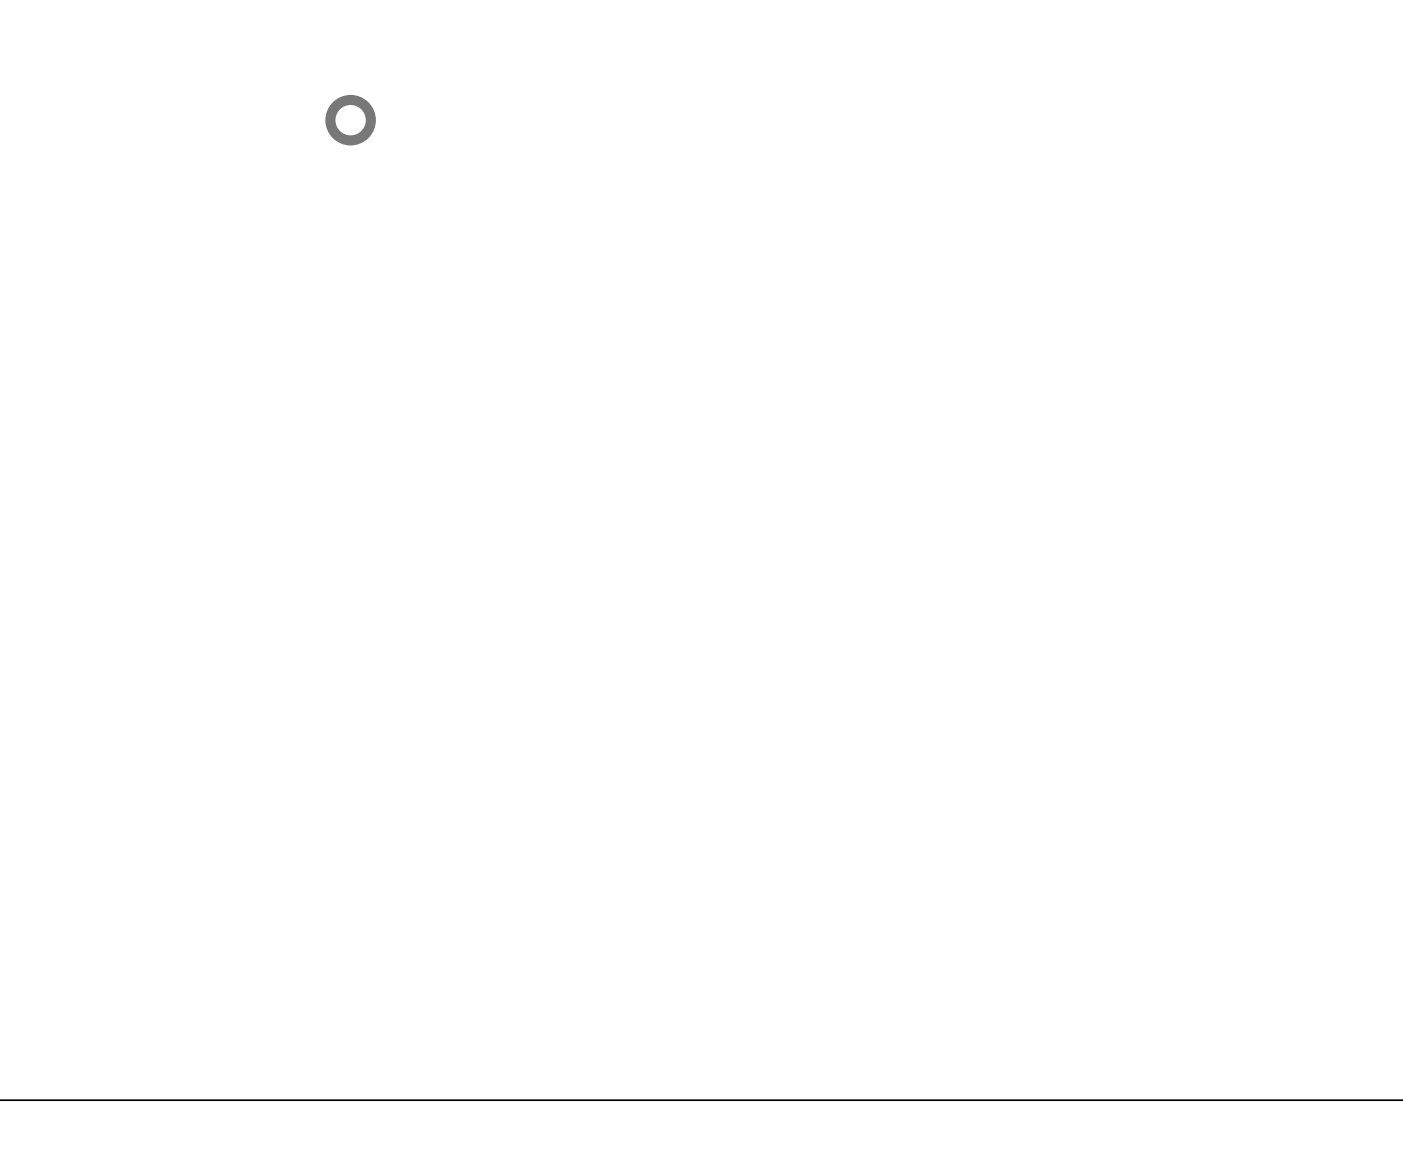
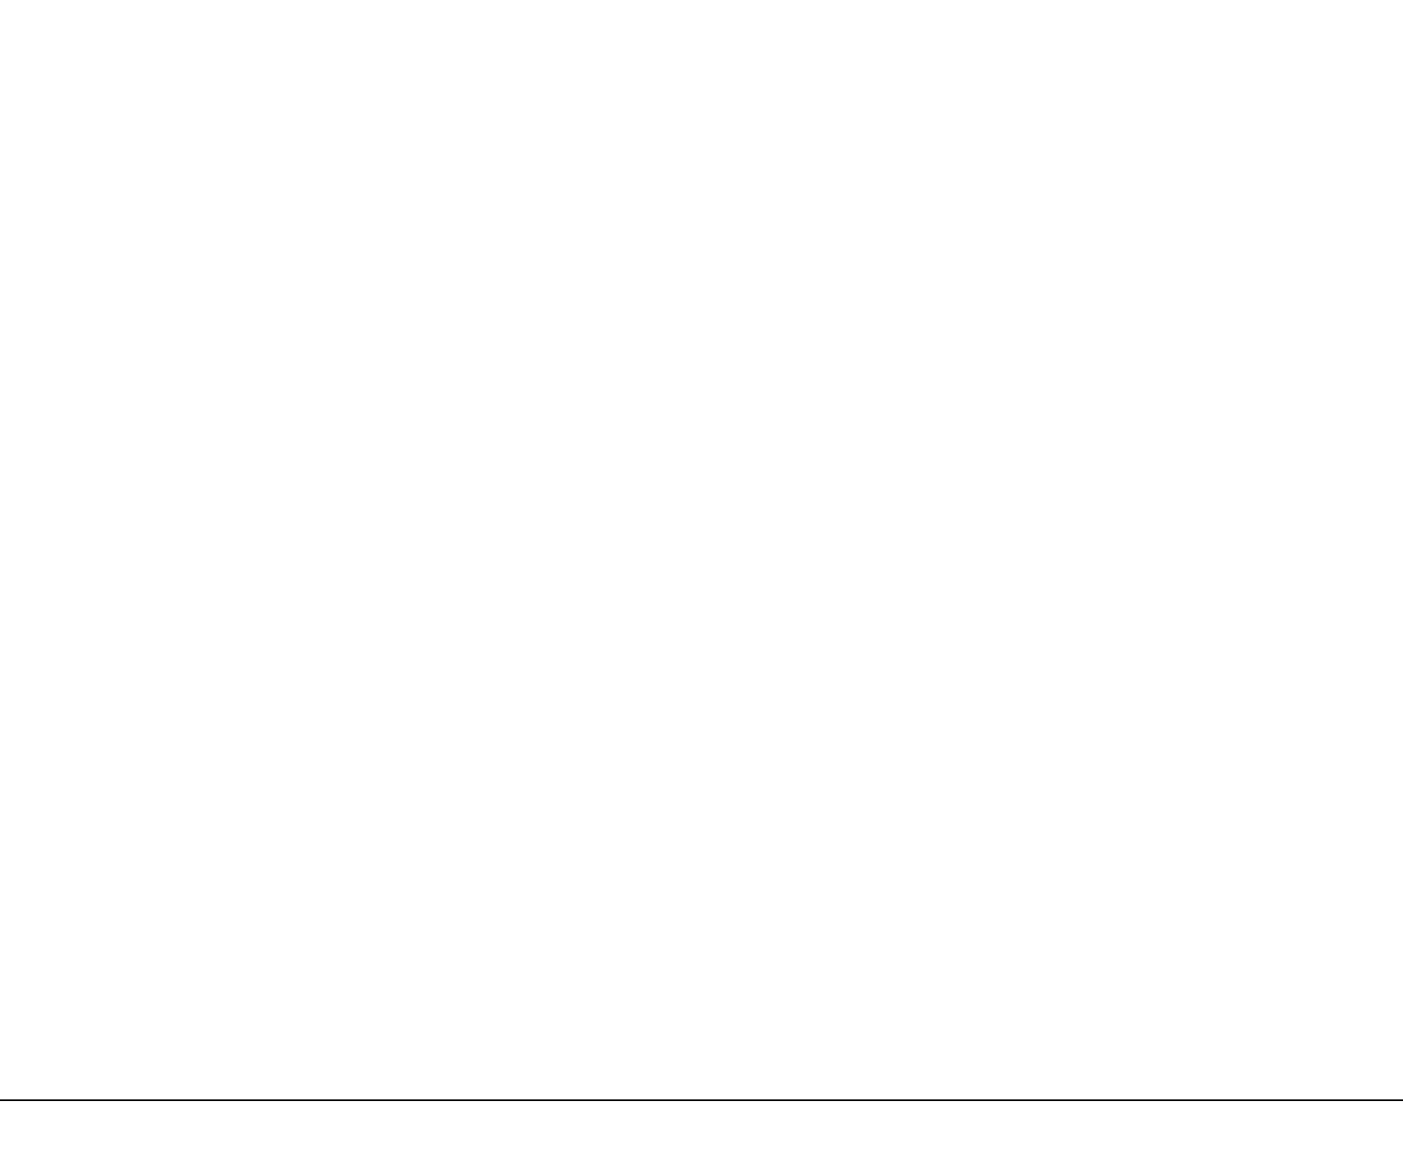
via: (350, 120) -> none

